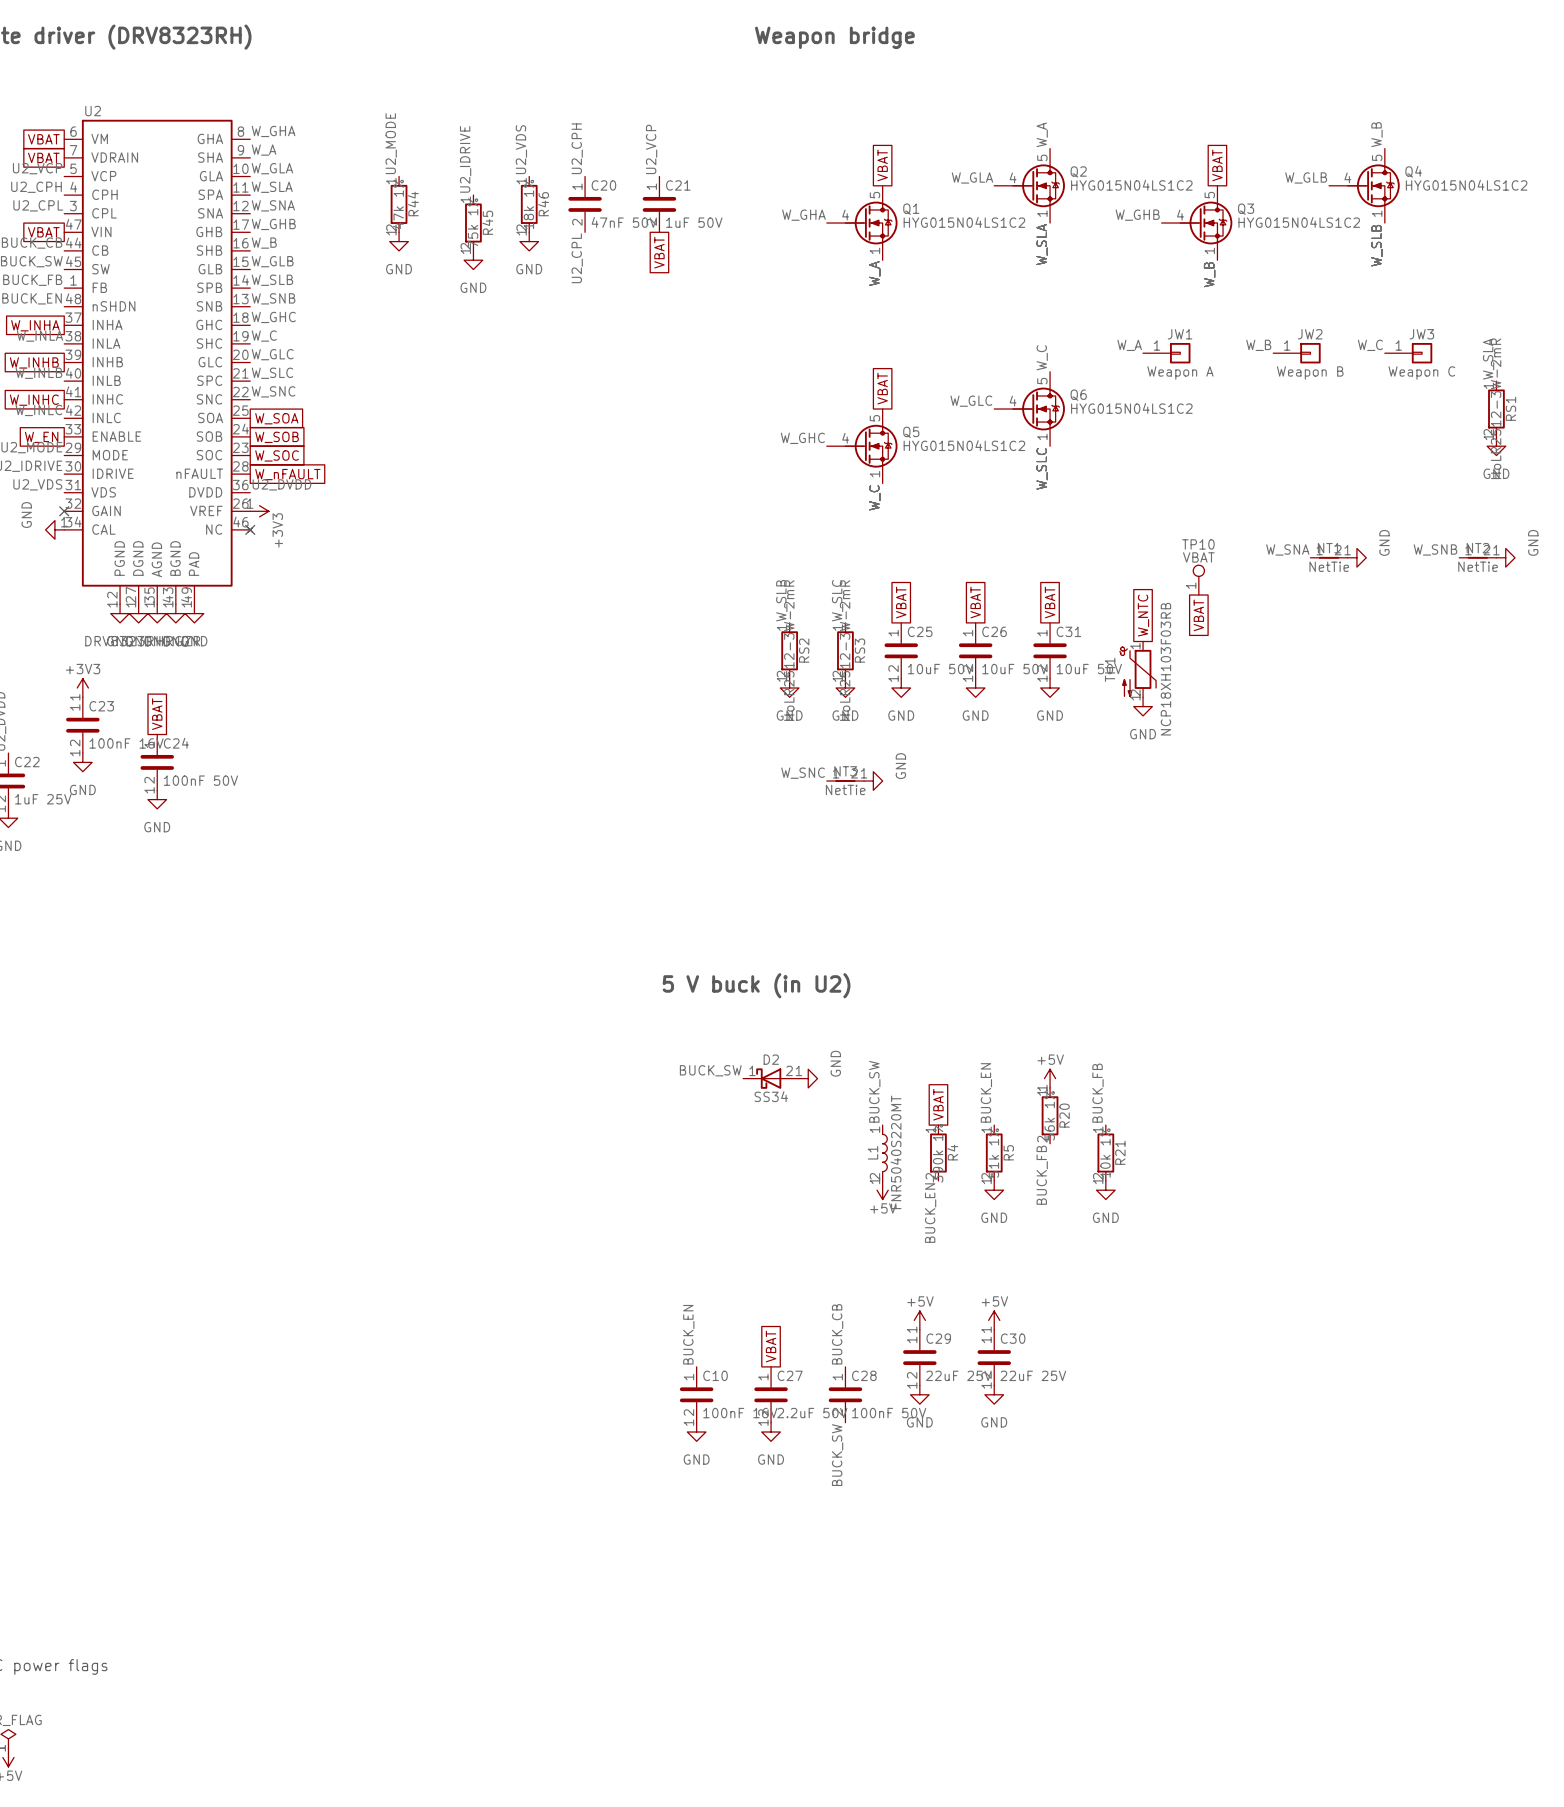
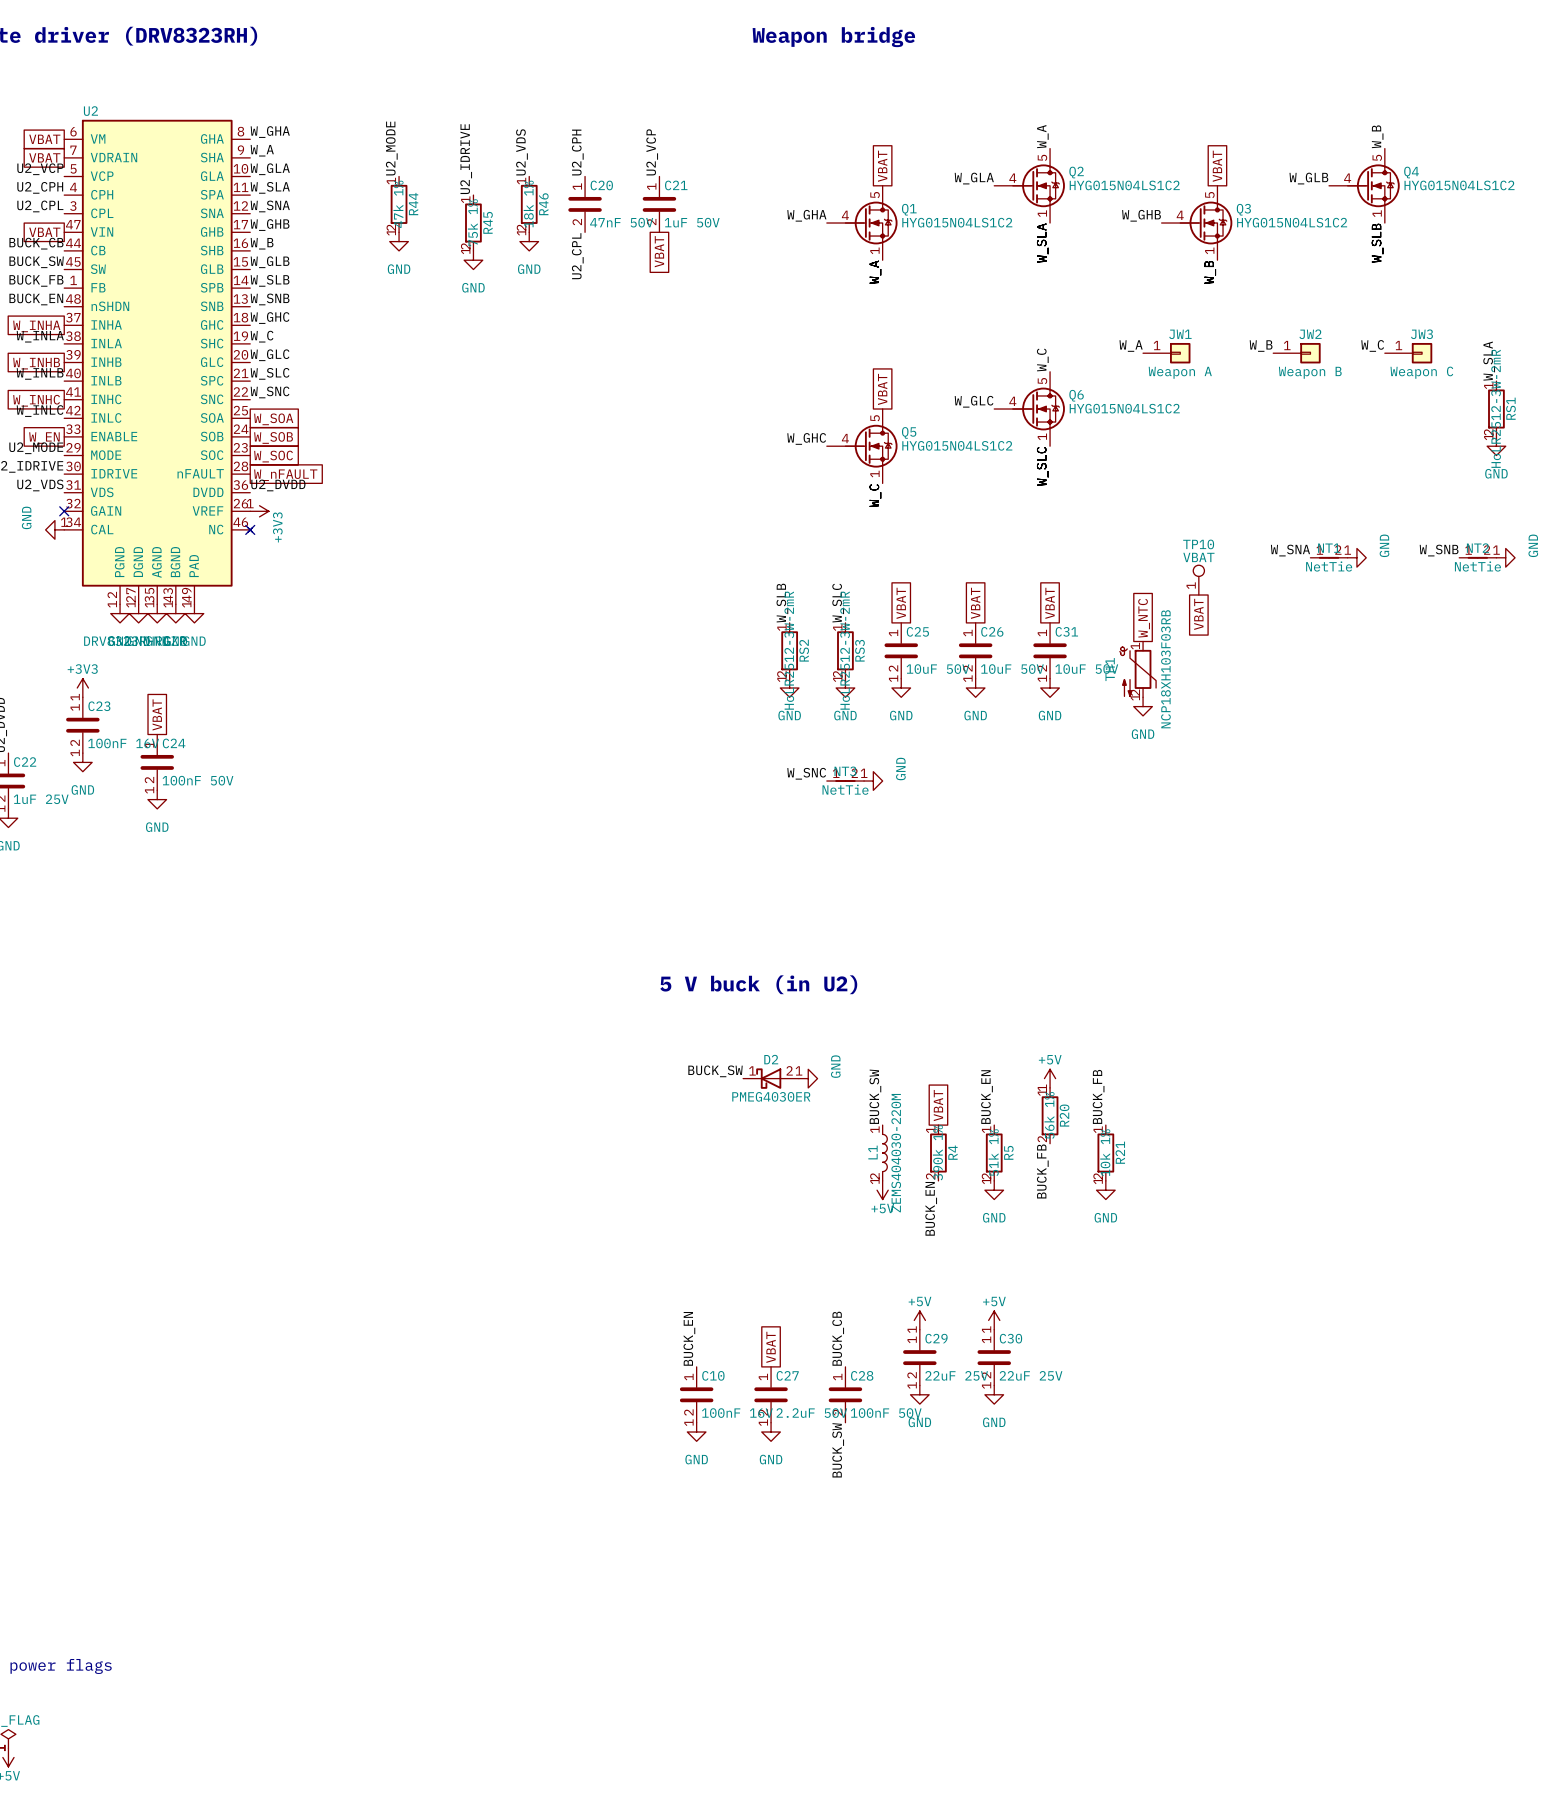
D2 value: SS34 (771, 1096) -> PMEG4030ER (771, 1096)
L1 value: FNR5040S220MT (896, 1152) -> ZEMS404030-220M (896, 1153)

